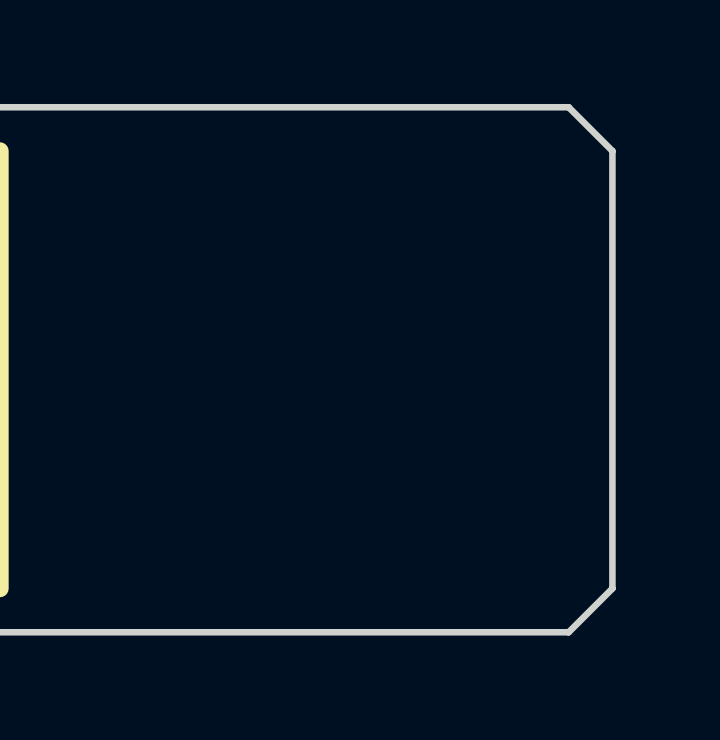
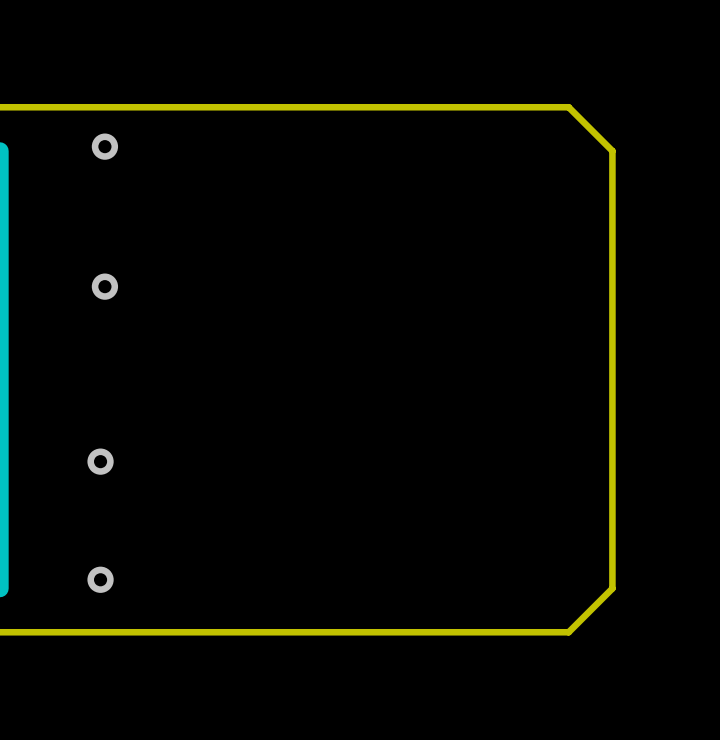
via: none -> (104, 146)
via: none -> (104, 286)
via: none -> (100, 461)
via: none -> (100, 579)

